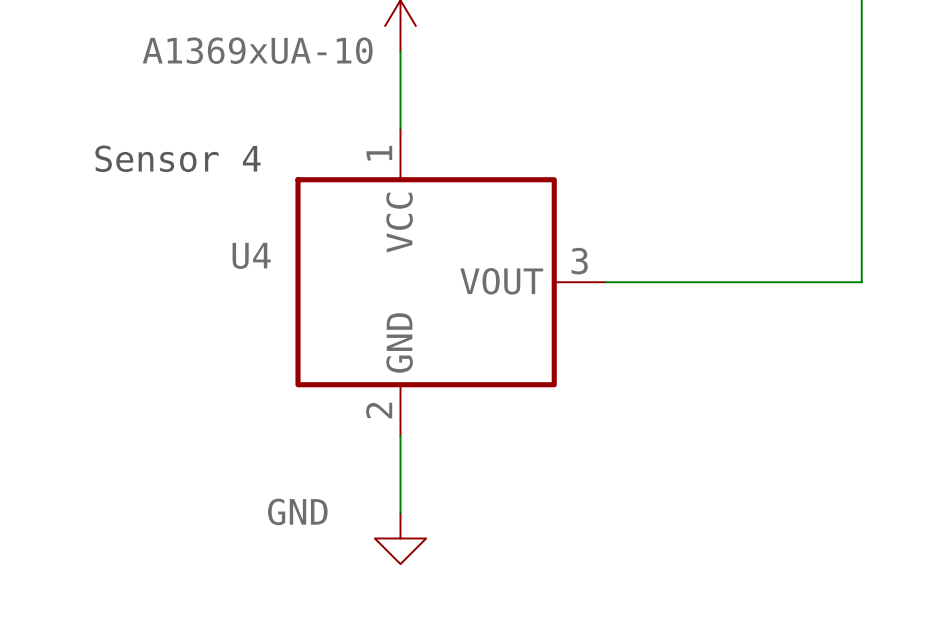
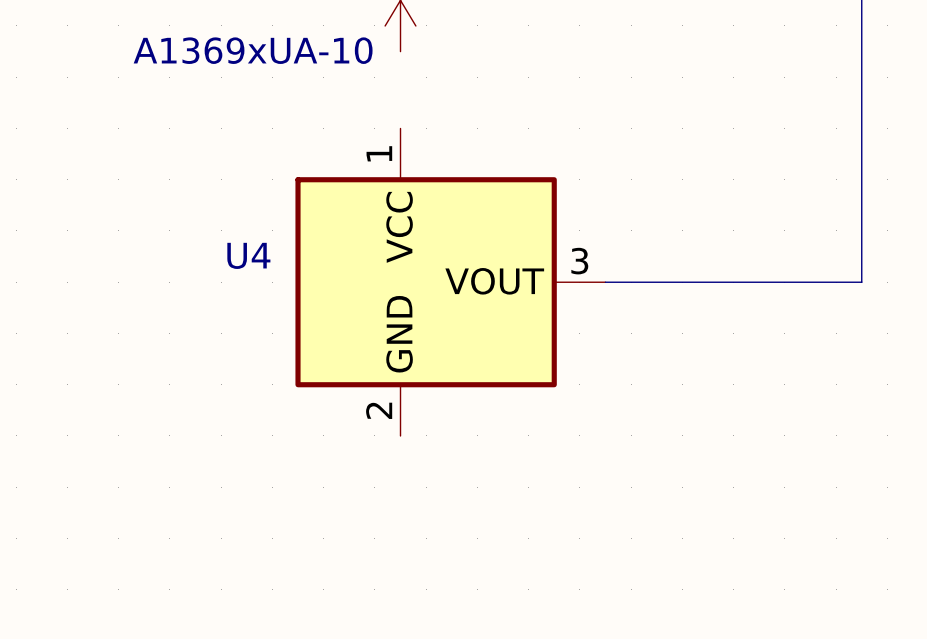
wire: (400, 51) (400, 128) -> none
text: Sensor 4 (178, 158) -> none
wire: (400, 435) (400, 512) -> none
power symbol: GND (400, 538) -> none

